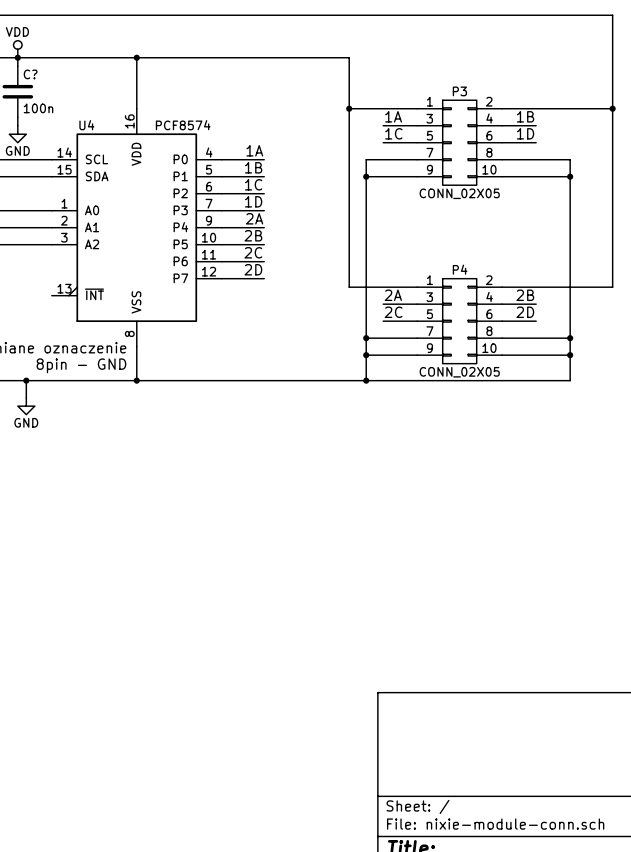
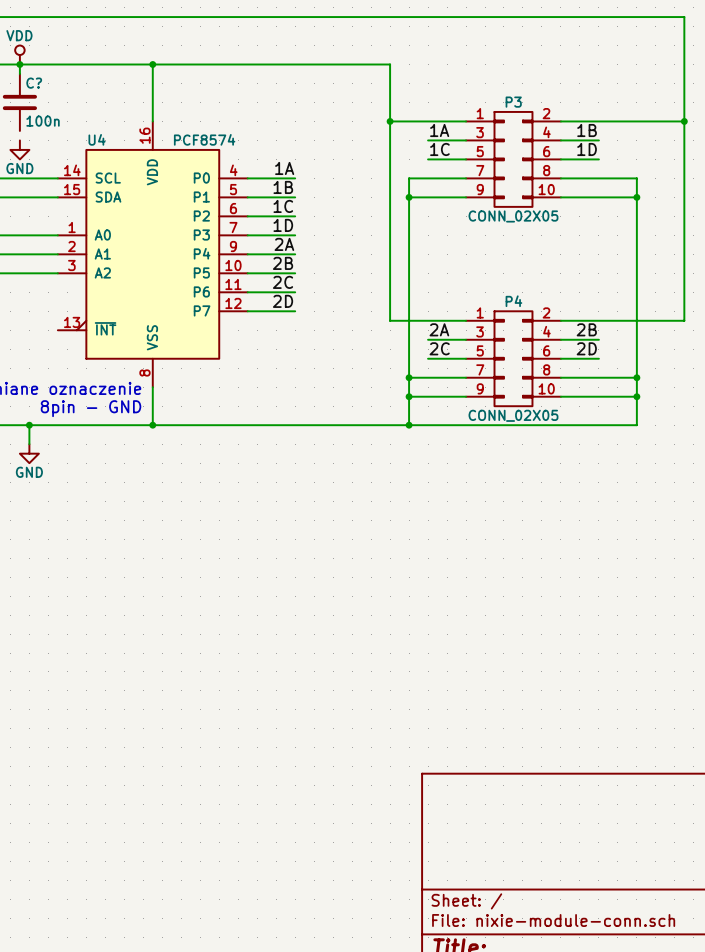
wire: (17, 117) (17, 125) -> none

